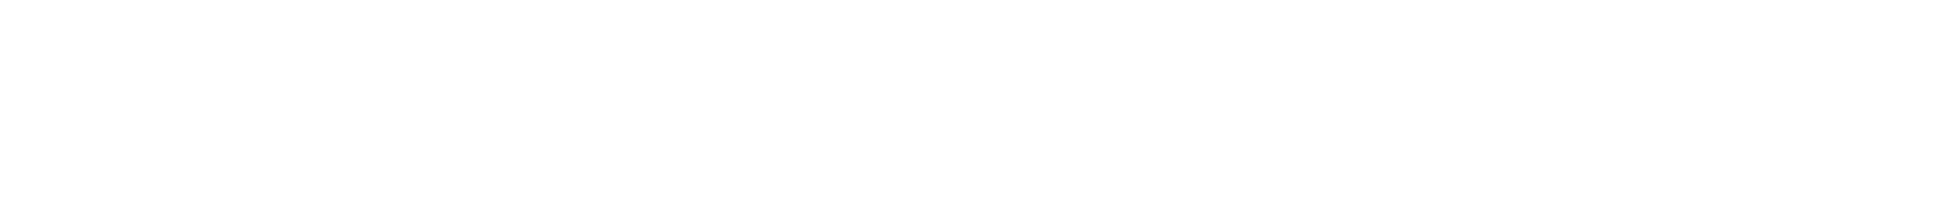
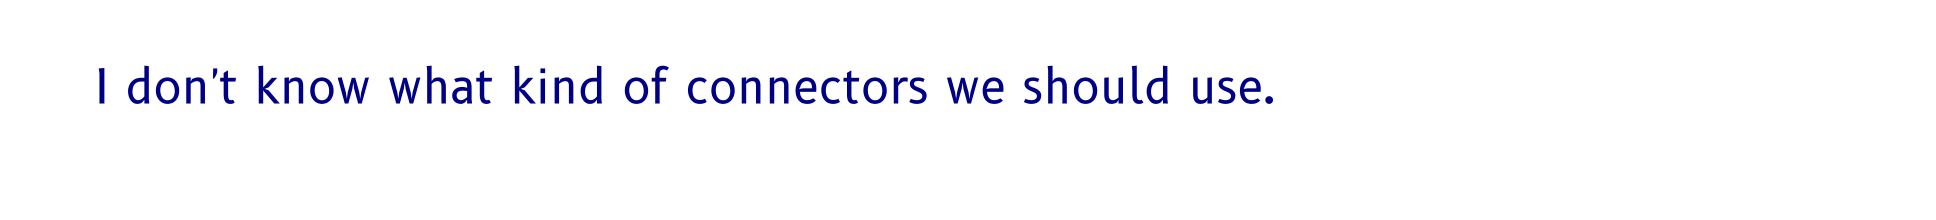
text: none -> I don't know what kind of connectors we should use. (685, 84)

